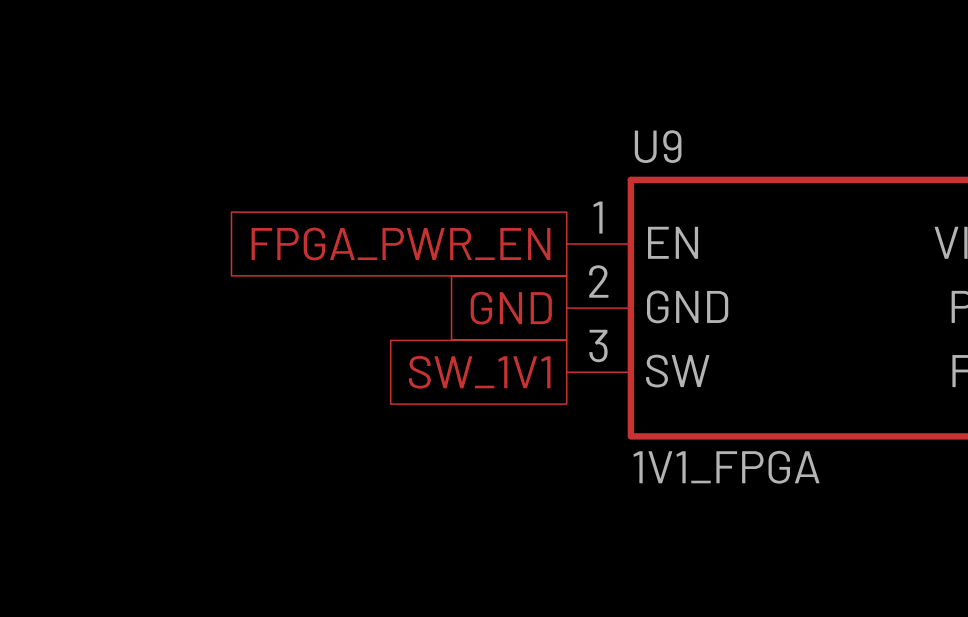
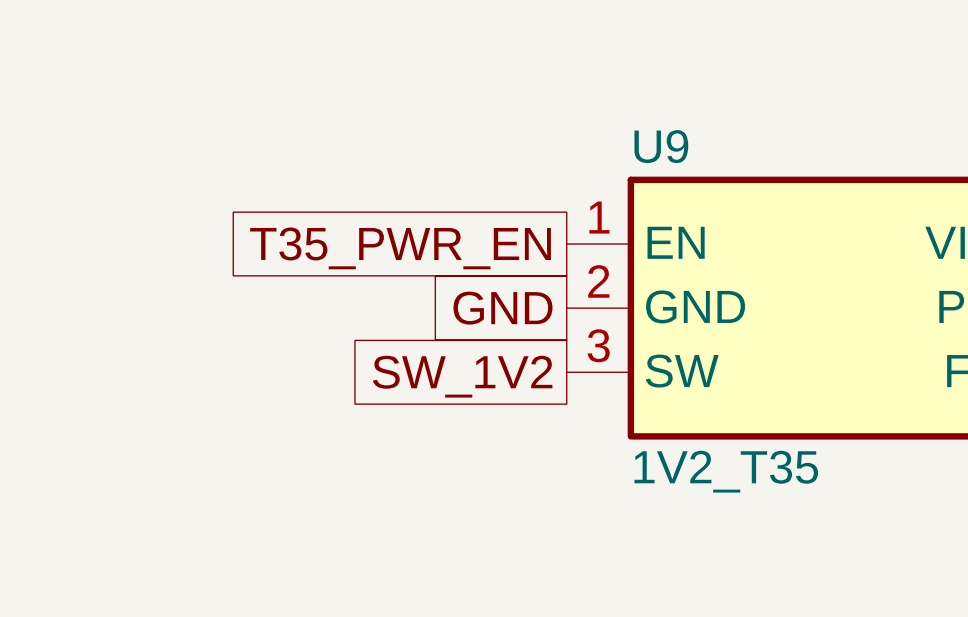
global label: FPGA_PWR_EN (401, 244) -> T35_PWR_EN (400, 248)
global label: SW_1V1 (479, 372) -> SW_1V2 (462, 376)
U9 value: 1V1_FPGA (726, 467) -> 1V2_T35 (726, 471)

